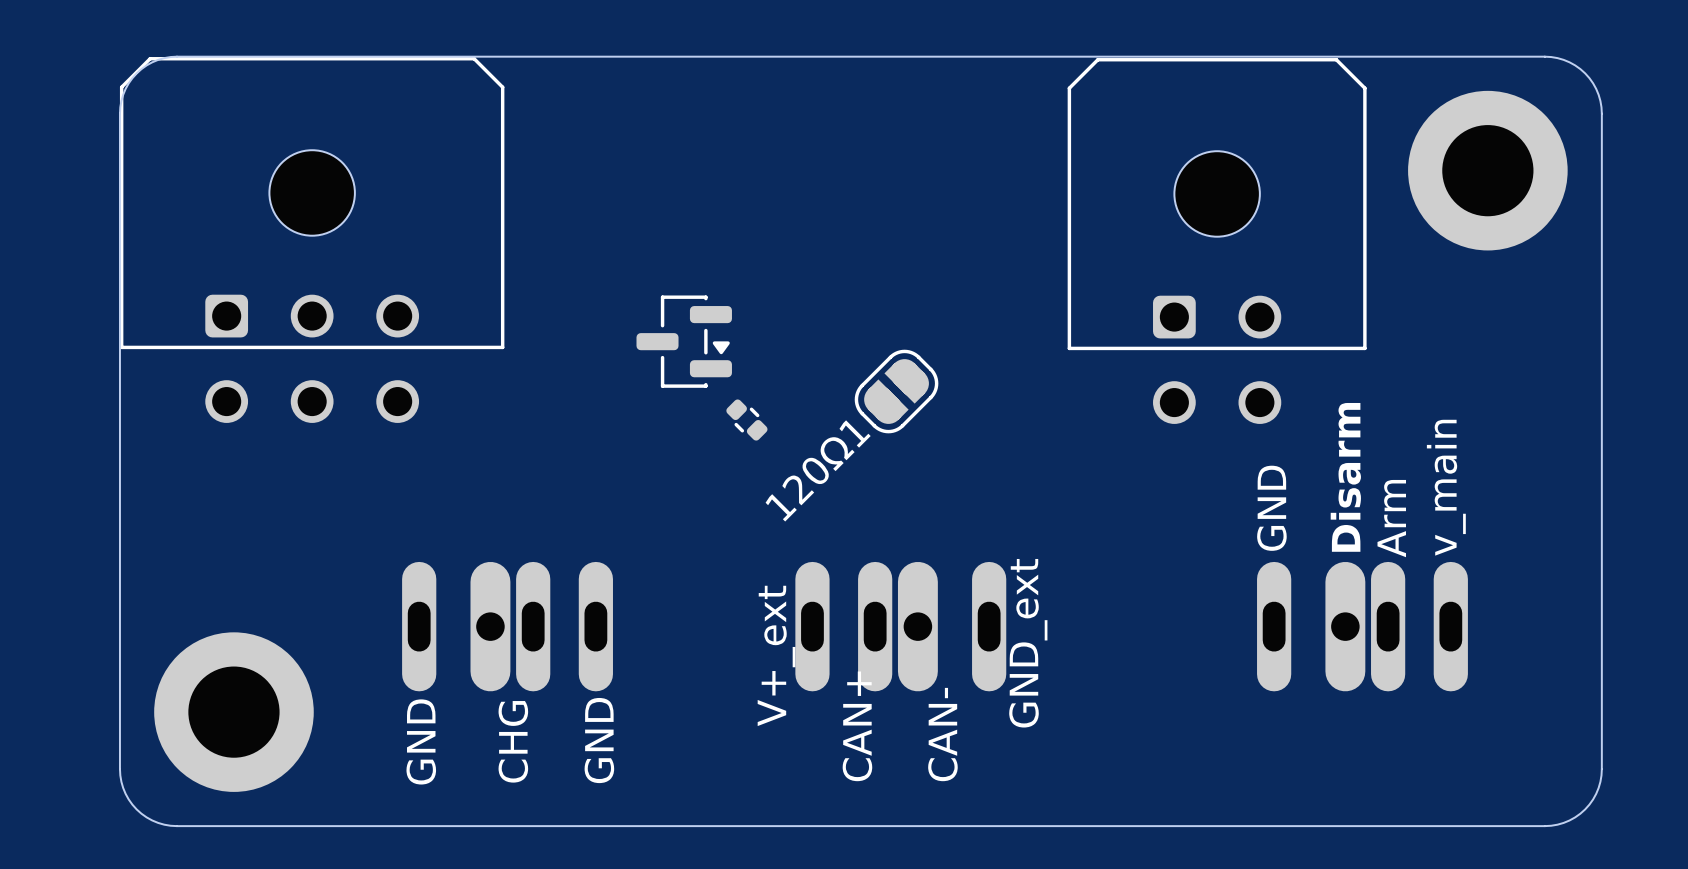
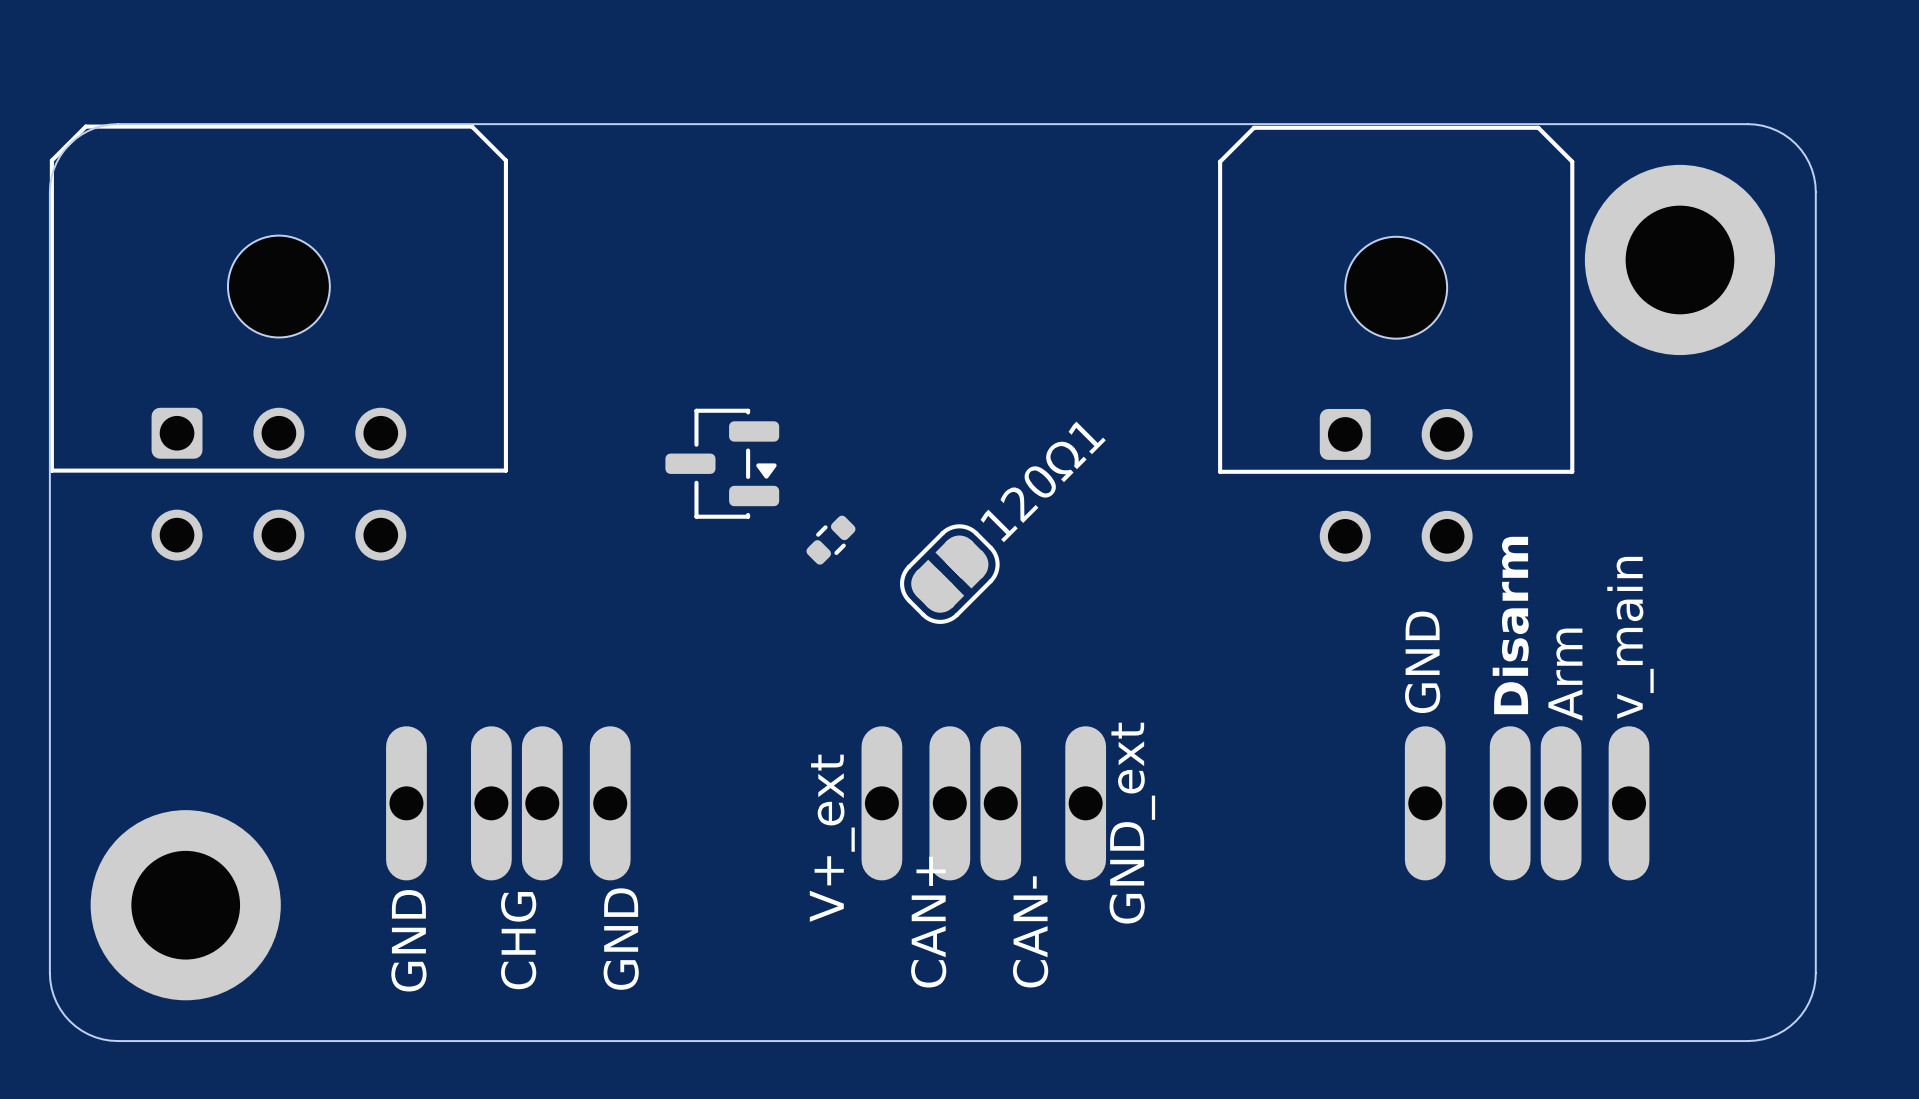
part position: (1217, 240) -> (1396, 343)
120Ω1 position: (896, 391) -> (949, 574)
part rotation: 0° (746, 420) -> 90° clockwise (830, 540)
part position: (746, 420) -> (830, 540)
120Ω1 name position: 120Ω1 (818, 470) -> 120Ω1 (1043, 481)
part footprint: [402, 561, 613, 692] -> [386, 726, 631, 881]
part footprint: [795, 561, 1007, 692] -> [861, 726, 1107, 881]
part footprint: [1257, 561, 1468, 692] -> [1404, 726, 1650, 881]

